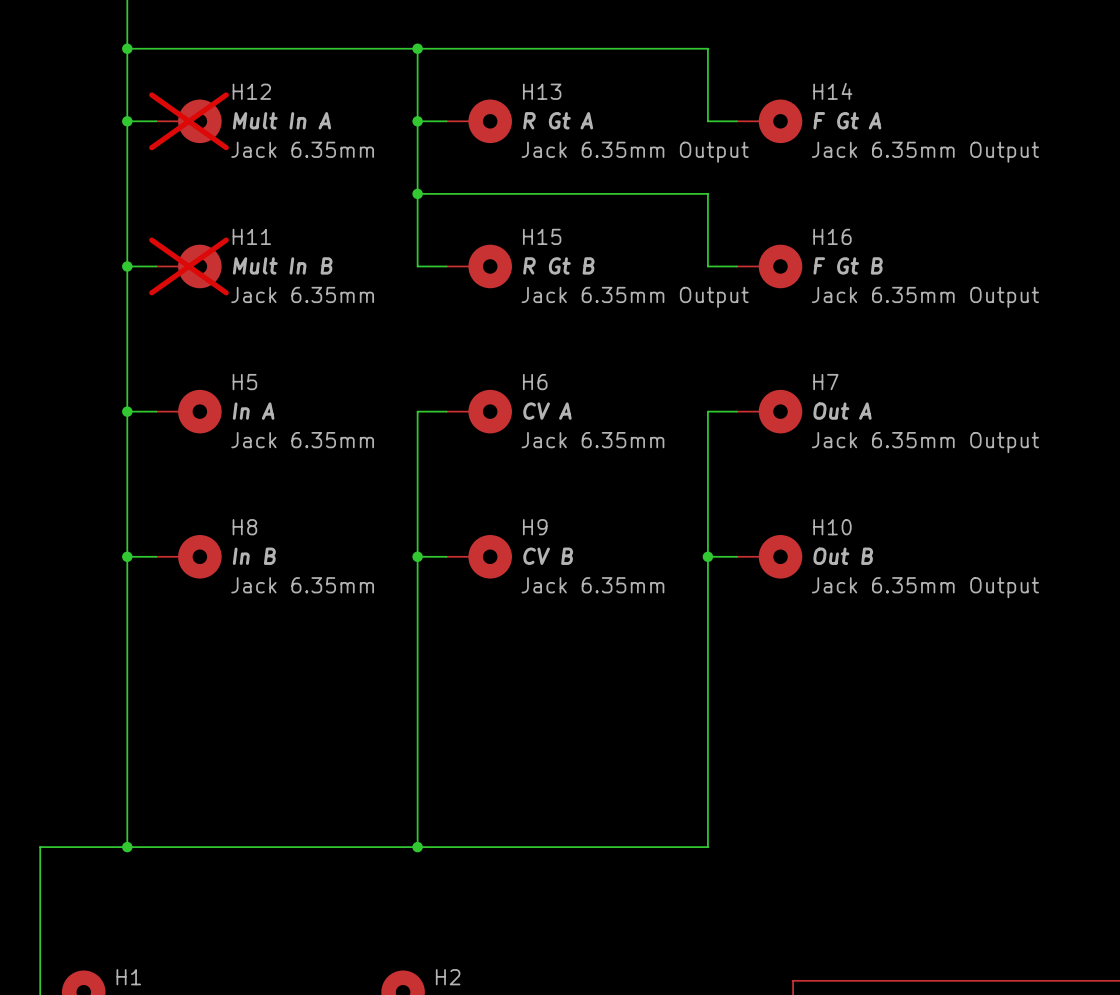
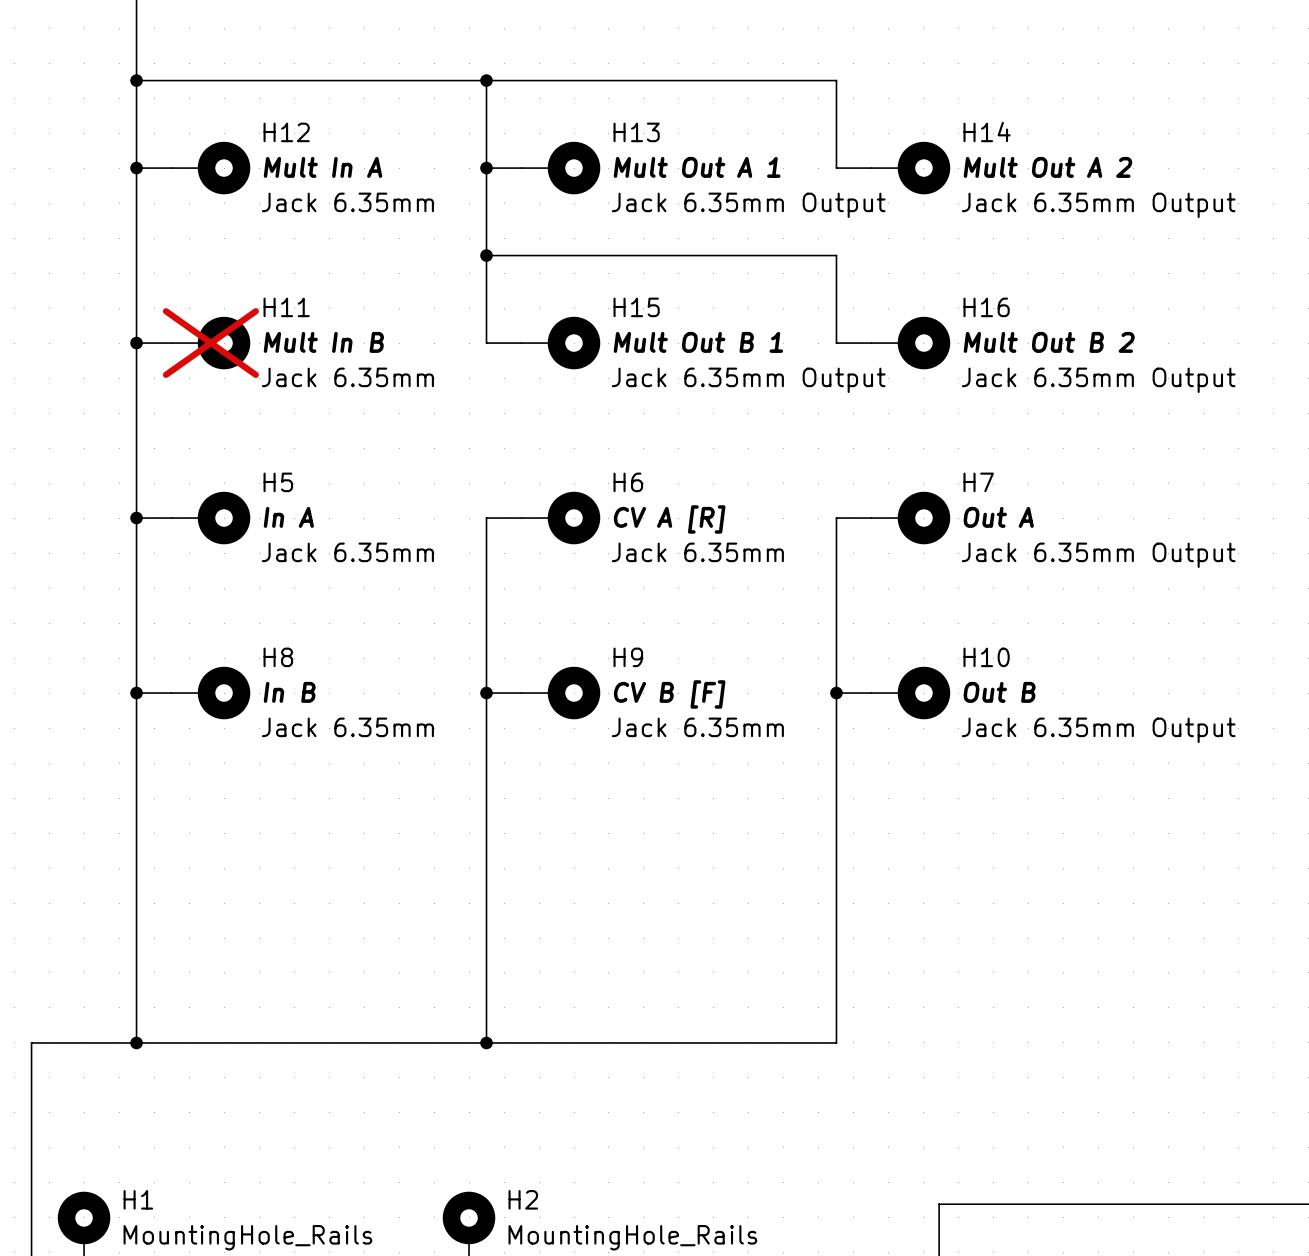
H13 value: R Gt A (558, 120) -> Mult Out A 1 (697, 167)
H14 value: F Gt A (847, 120) -> Mult Out A 2 (1047, 167)
H12 do-not-place cross: (188, 121) -> none
H15 value: R Gt B (558, 265) -> Mult Out B 1 (698, 342)
H16 value: F Gt B (848, 265) -> Mult Out B 2 (1049, 342)
H6 value: CV A (547, 411) -> CV A [R] (669, 519)
H9 value: CV B (548, 556) -> CV B [F] (669, 694)

